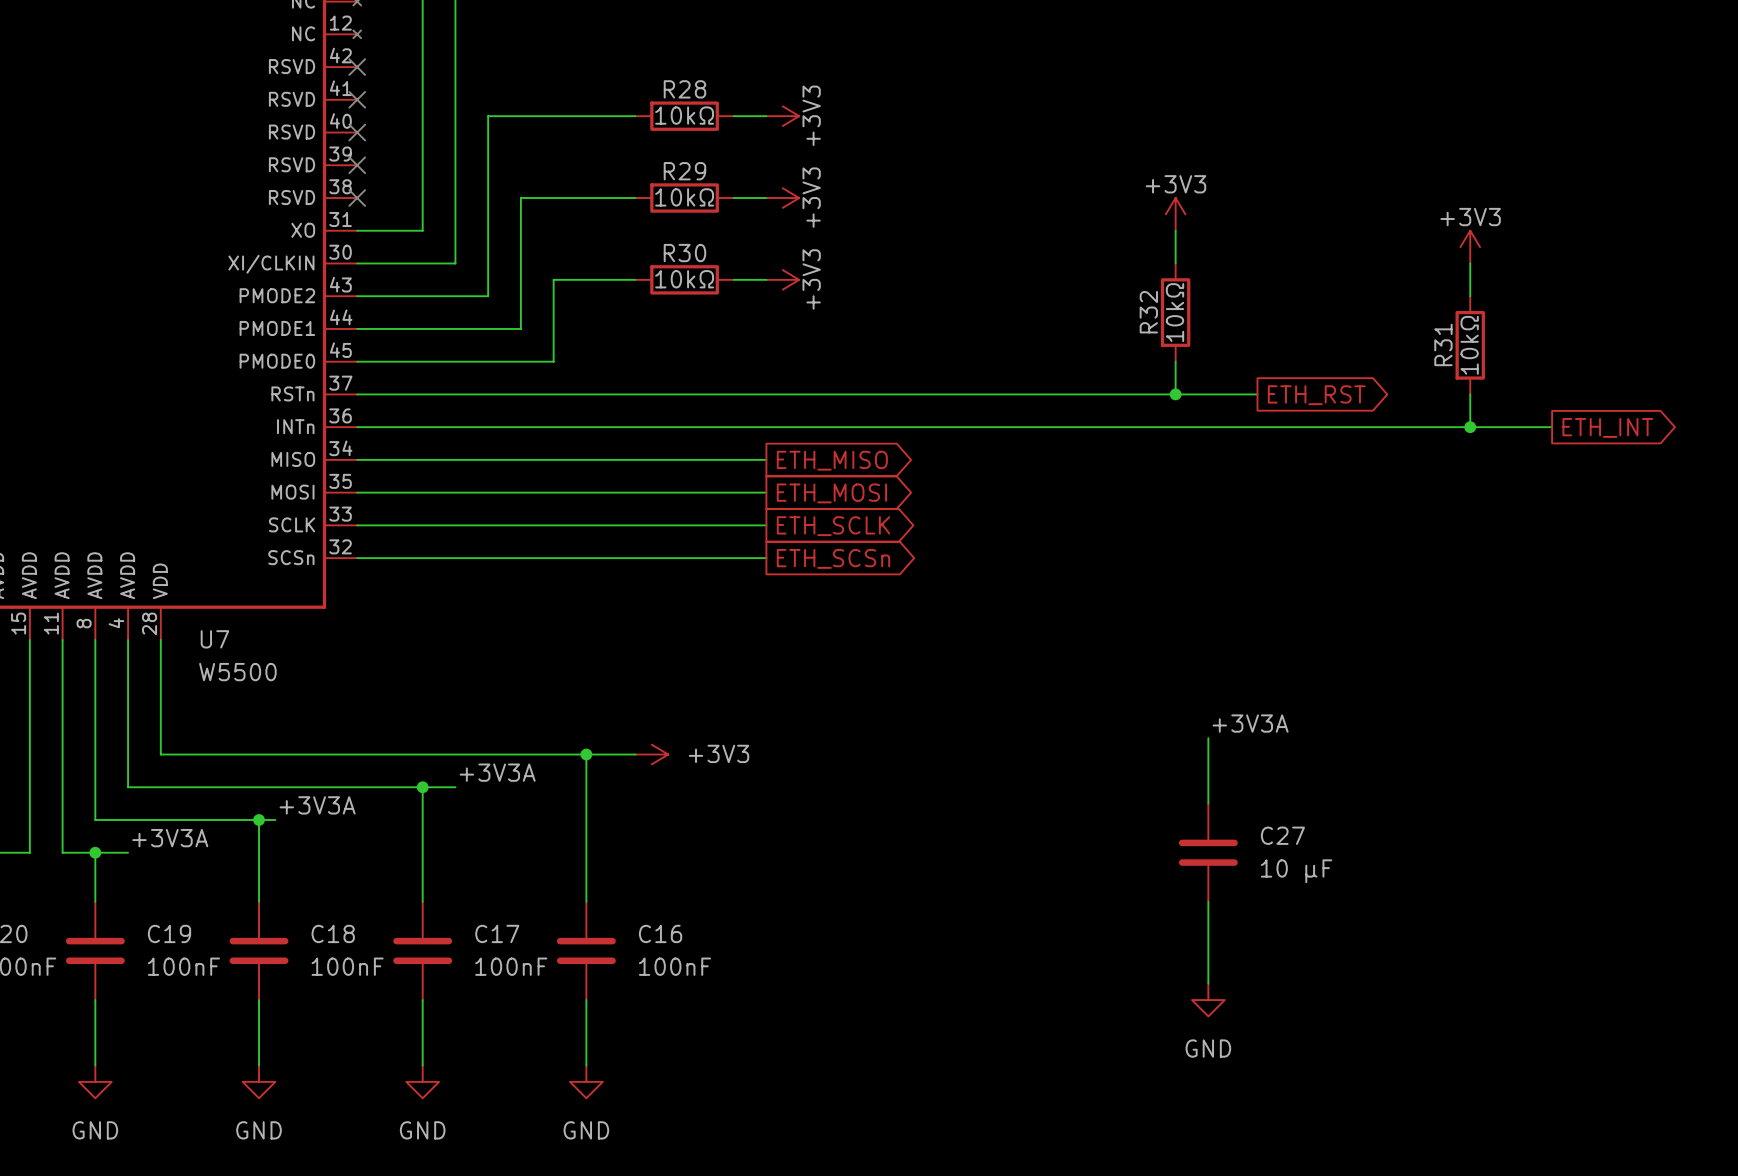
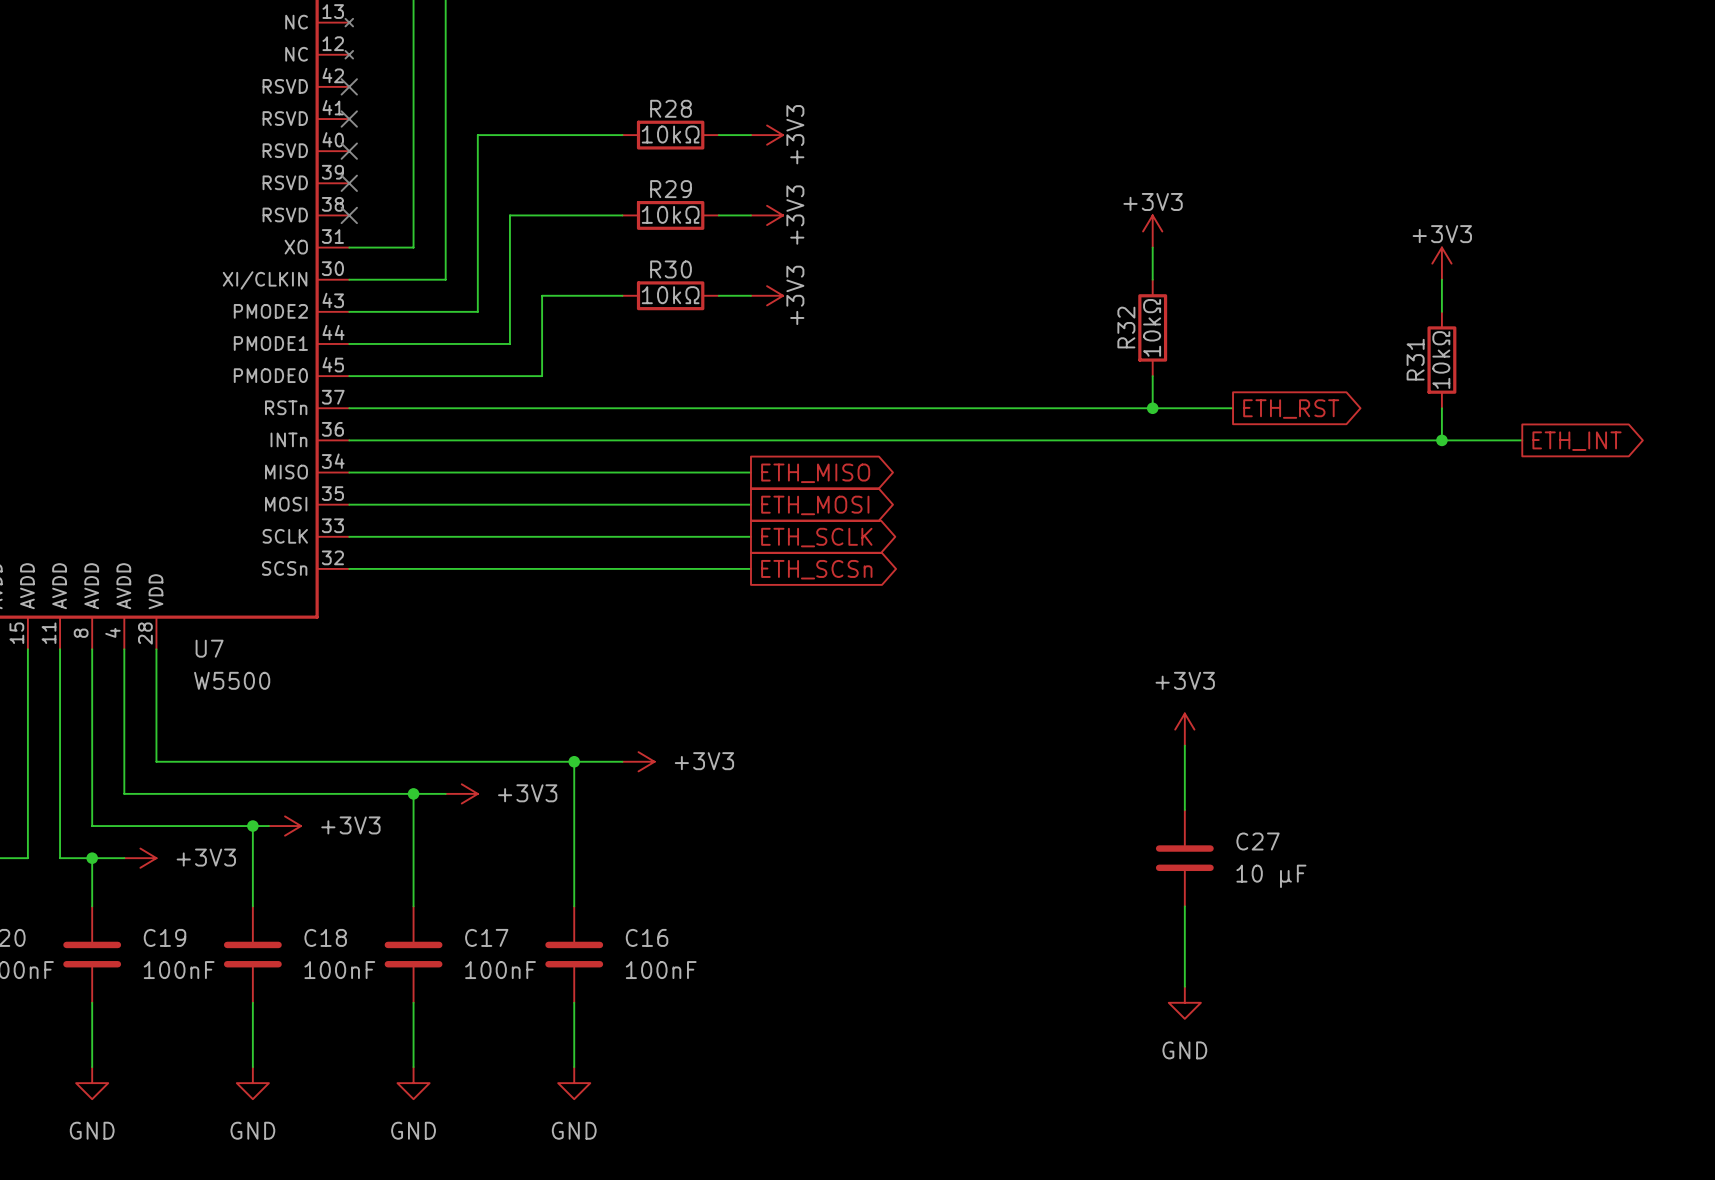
power symbol: none -> +3V3 (1184, 729)
label: +3V3A (1250, 723) -> none
label: +3V3A (497, 772) -> none
power symbol: none -> +3V3 (461, 793)
label: +3V3A (317, 805) -> none
power symbol: none -> +3V3 (285, 826)
label: +3V3A (170, 838) -> none
power symbol: none -> +3V3 (140, 858)

